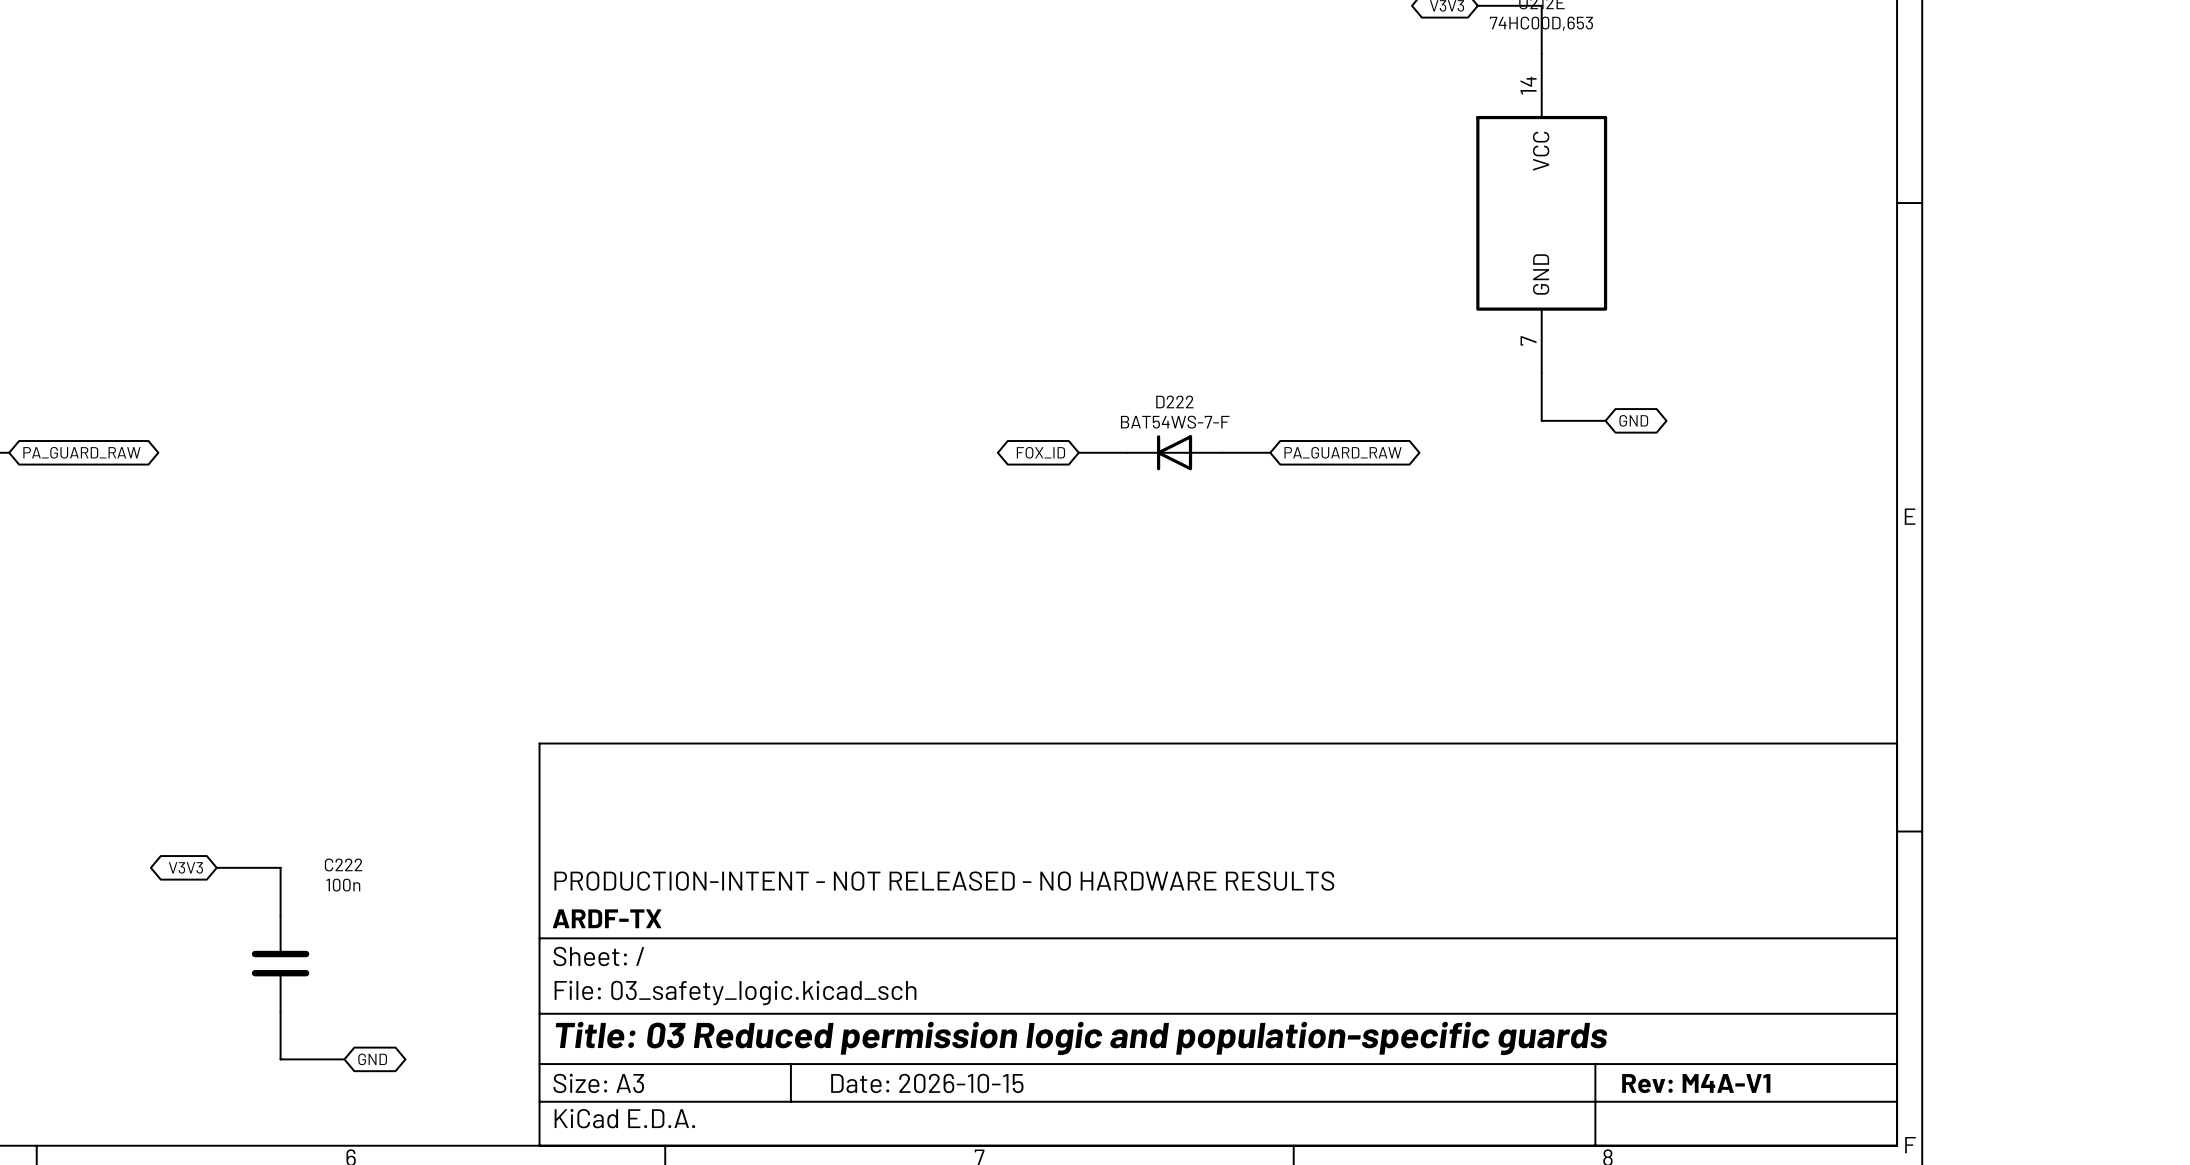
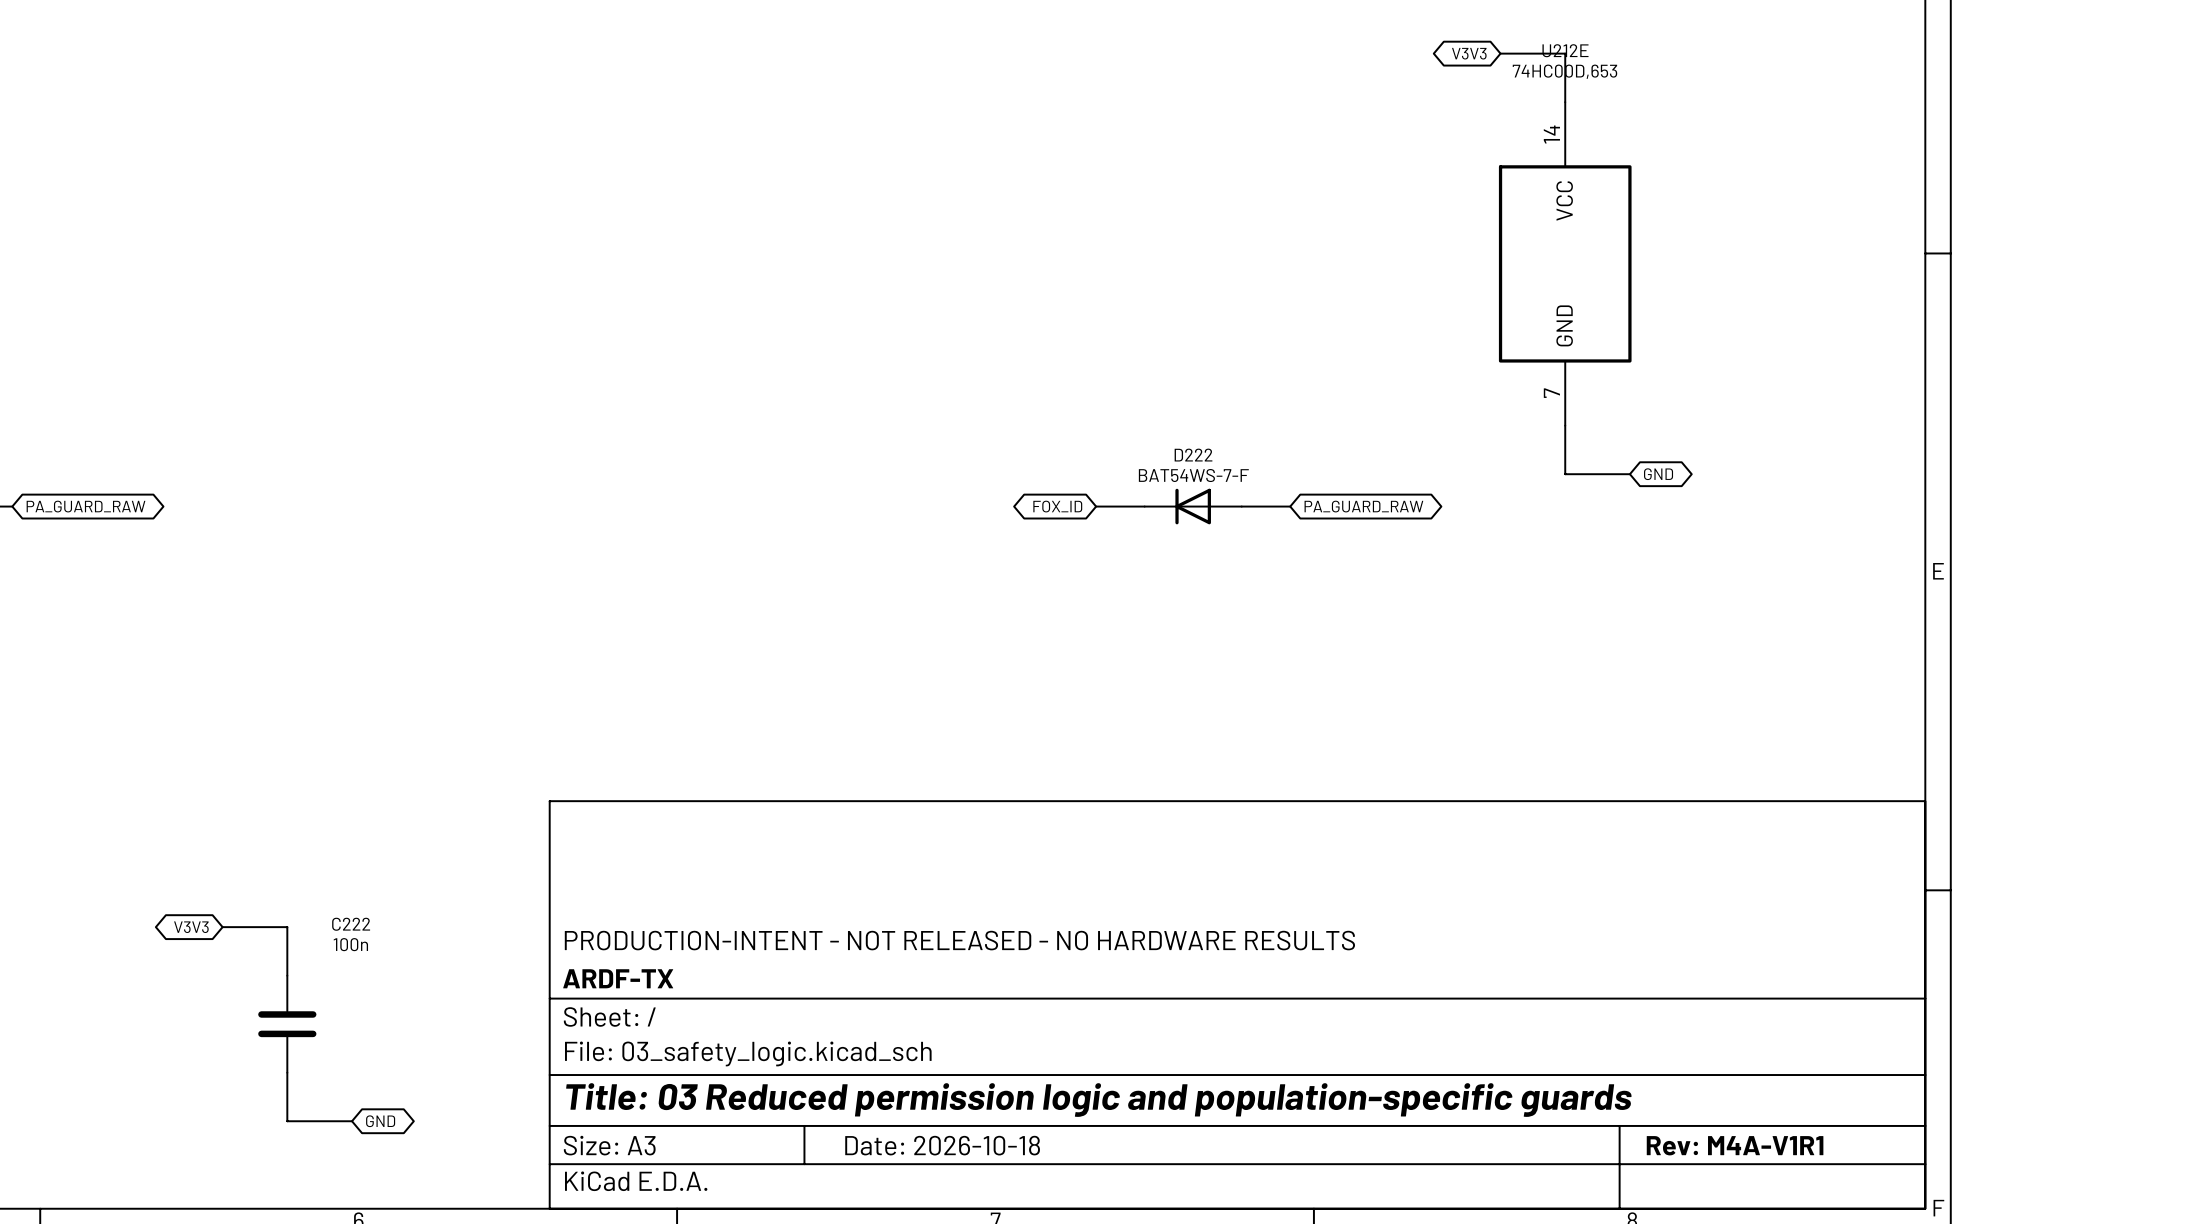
title block: Date: 2026-10-15 (927, 1083) -> Date: 2026-10-18 (942, 1145)
title block: Rev: M4A-V1 (1696, 1083) -> Rev: M4A-V1R1 (1735, 1145)

